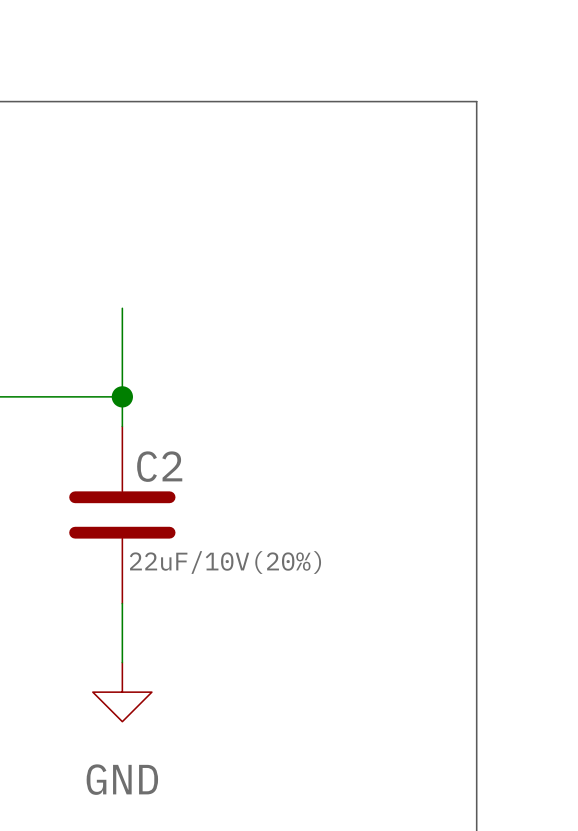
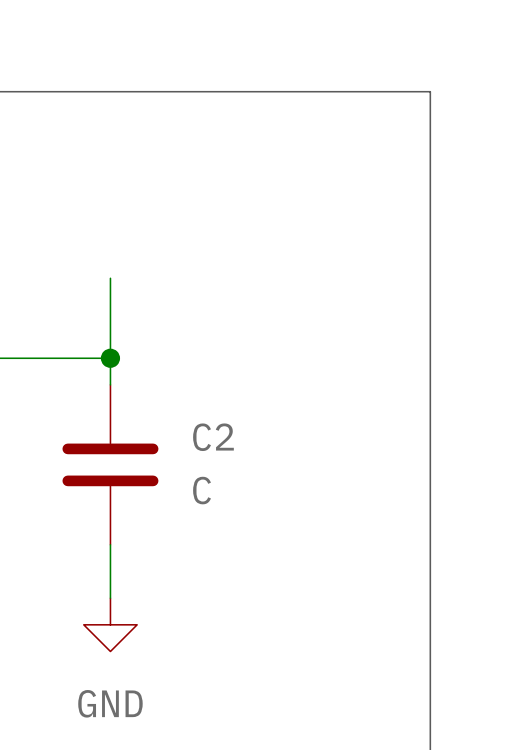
C2 name position: C2 (159, 466) -> C2 (213, 437)
C2 value: 22uF/10V(20%) (225, 562) -> C (202, 490)

